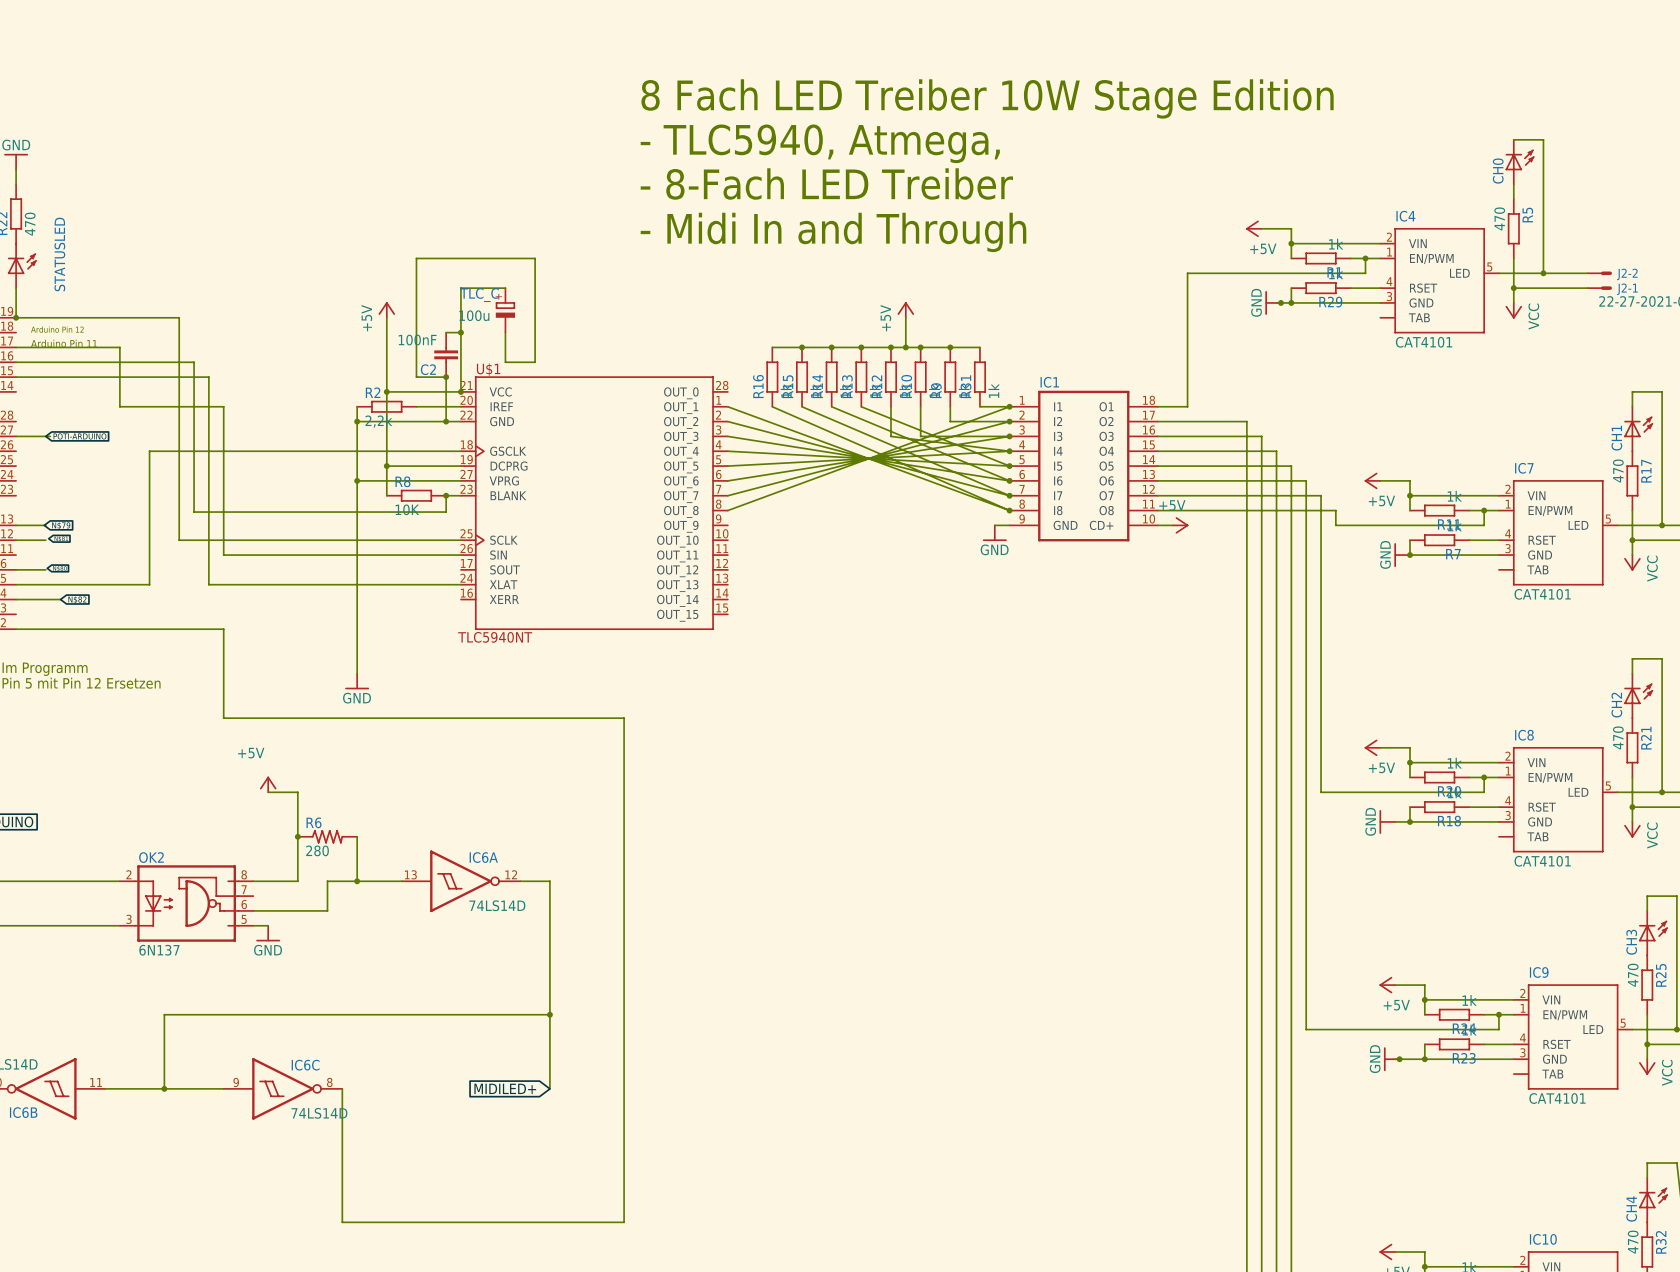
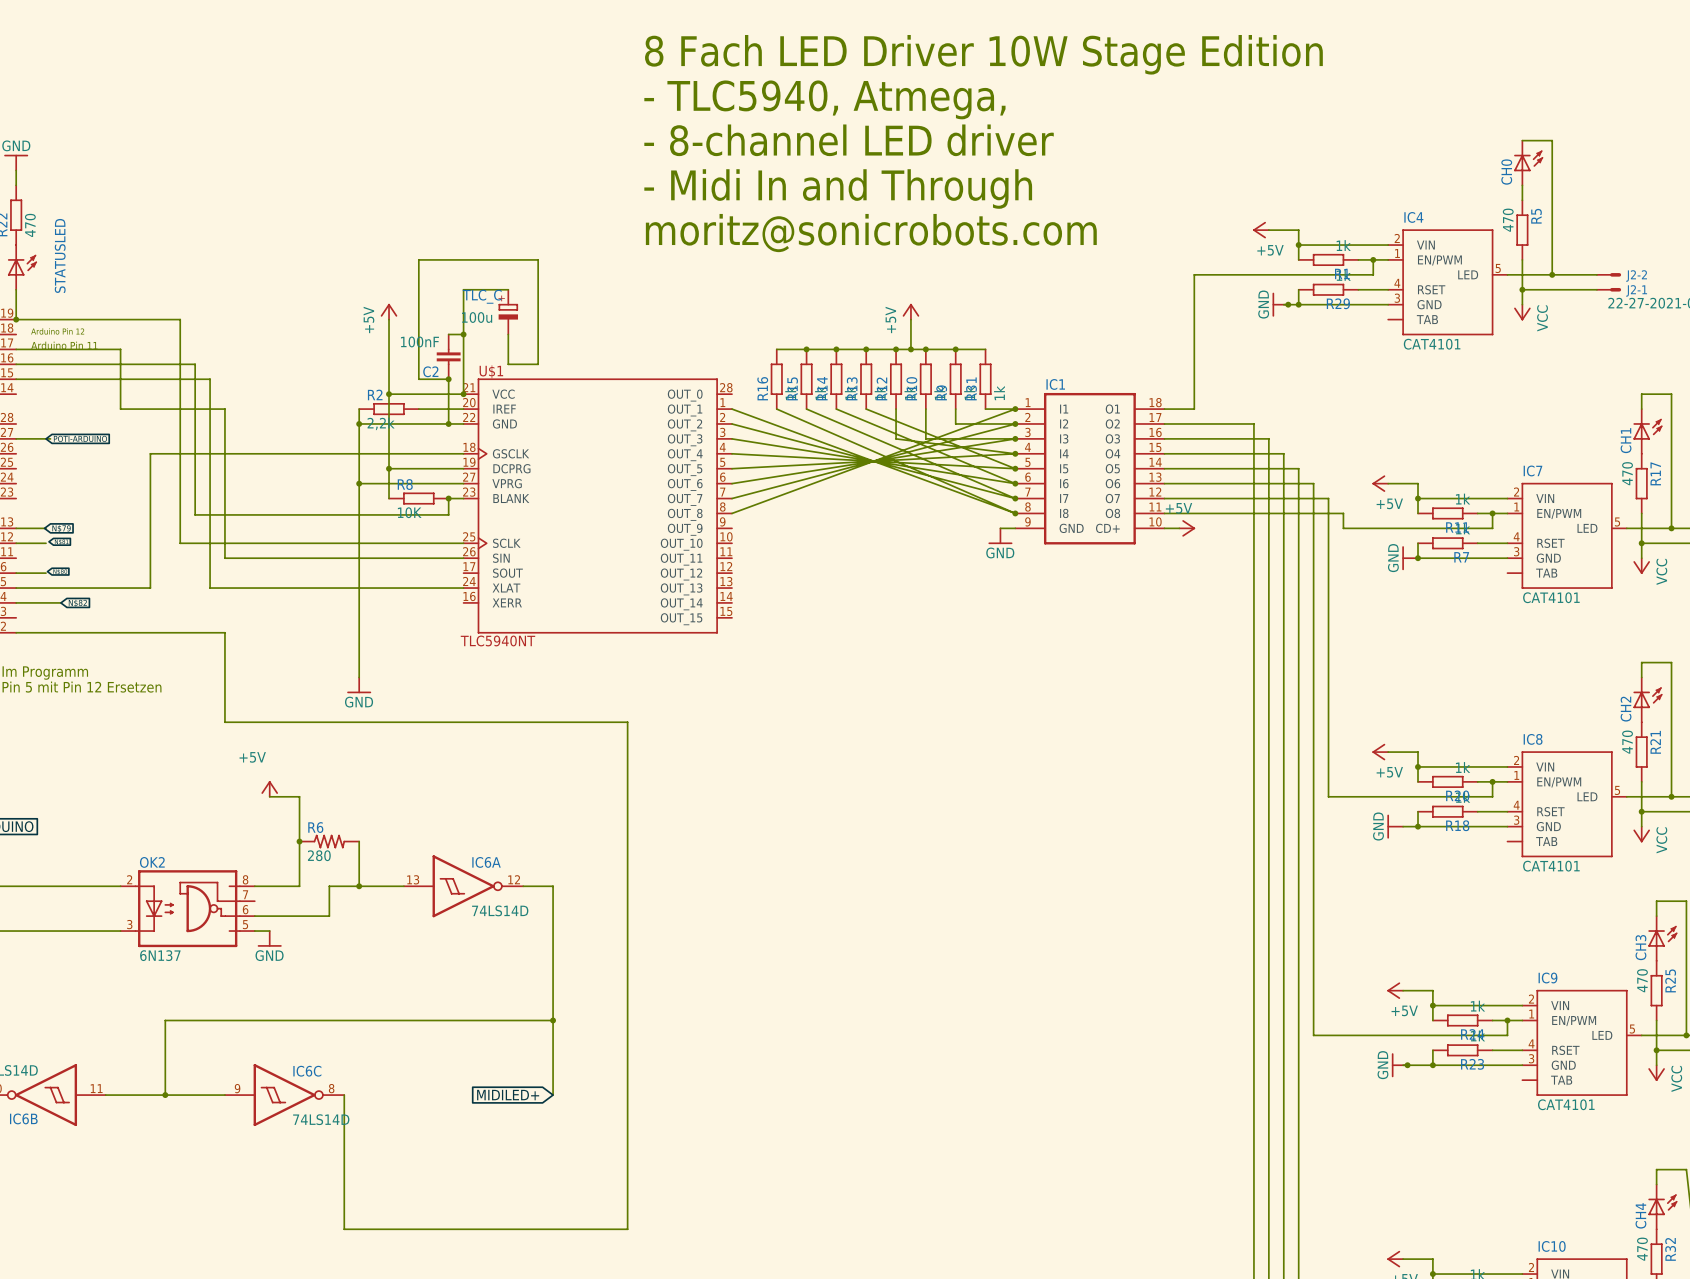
text: none -> 8 Fach LED Driver 10W Stage Edition (983, 54)
text: 8 Fach LED Treiber 10W Stage Edition (987, 98) -> - TLC5940, Atmega, (824, 99)
text: - TLC5940, Atmega, (820, 143) -> - 8-channel LED driver (849, 140)
text: - 8-Fach LED Treiber (826, 183) -> - Midi In and Through (838, 189)
text: - Midi In and Through (833, 232) -> moritz@sonicrobots.com (871, 233)

